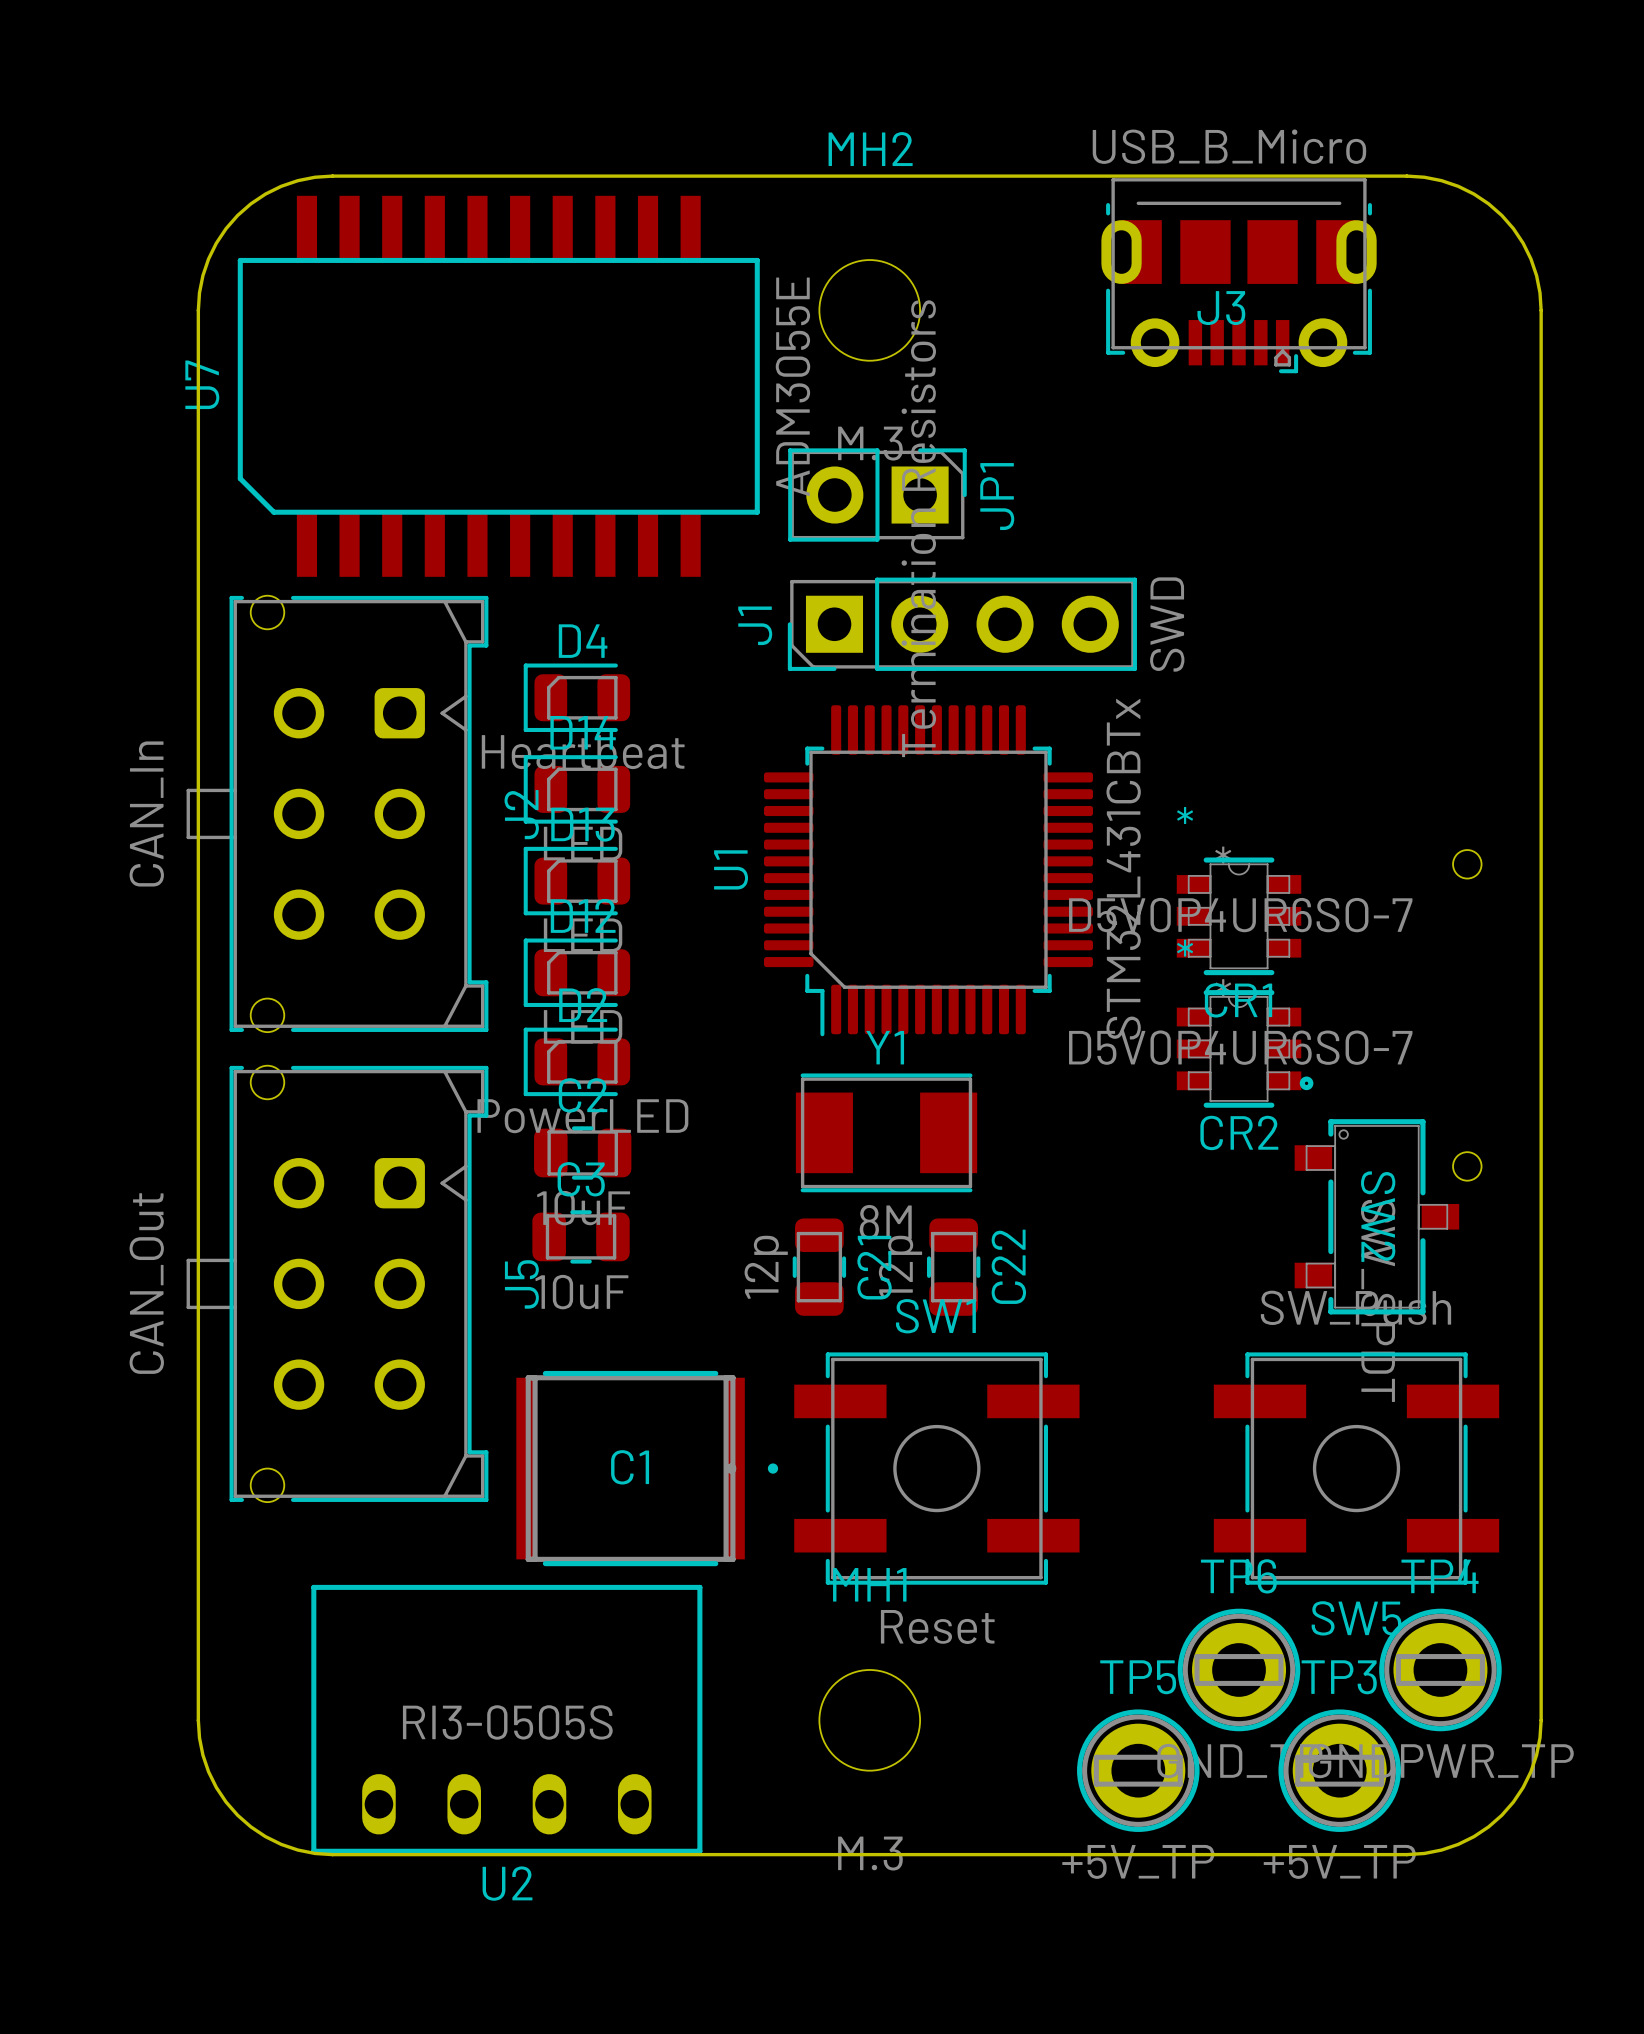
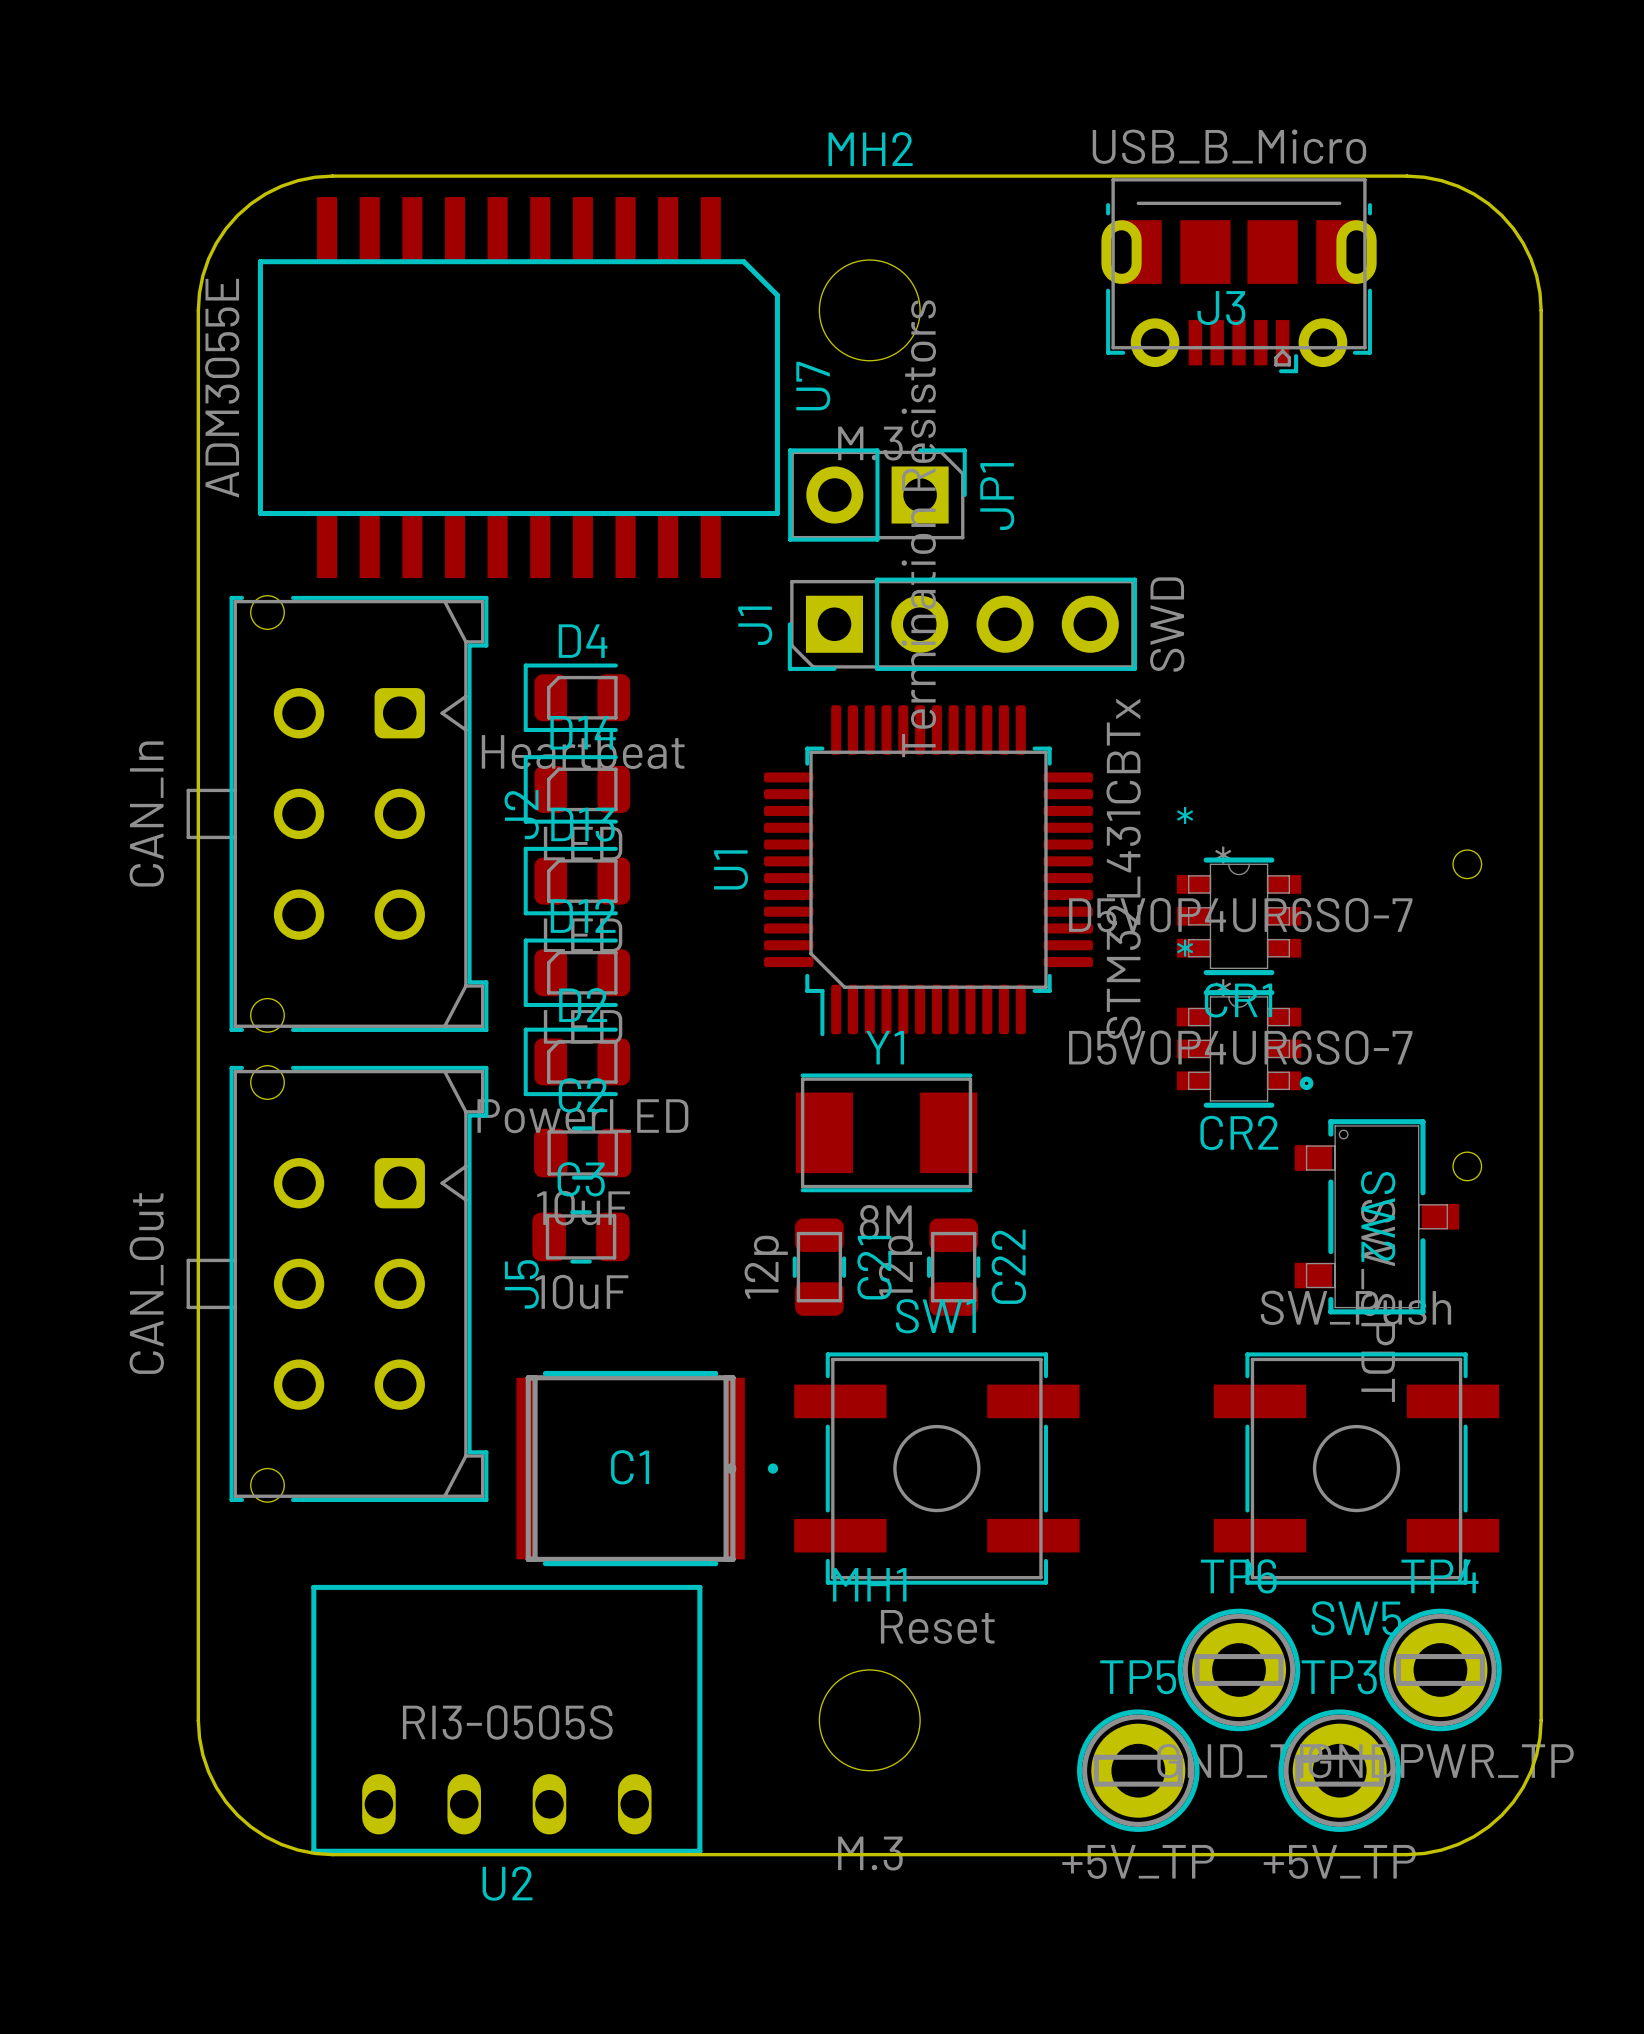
U7 rotation: 0° (498, 386) -> 180° (518, 387)

